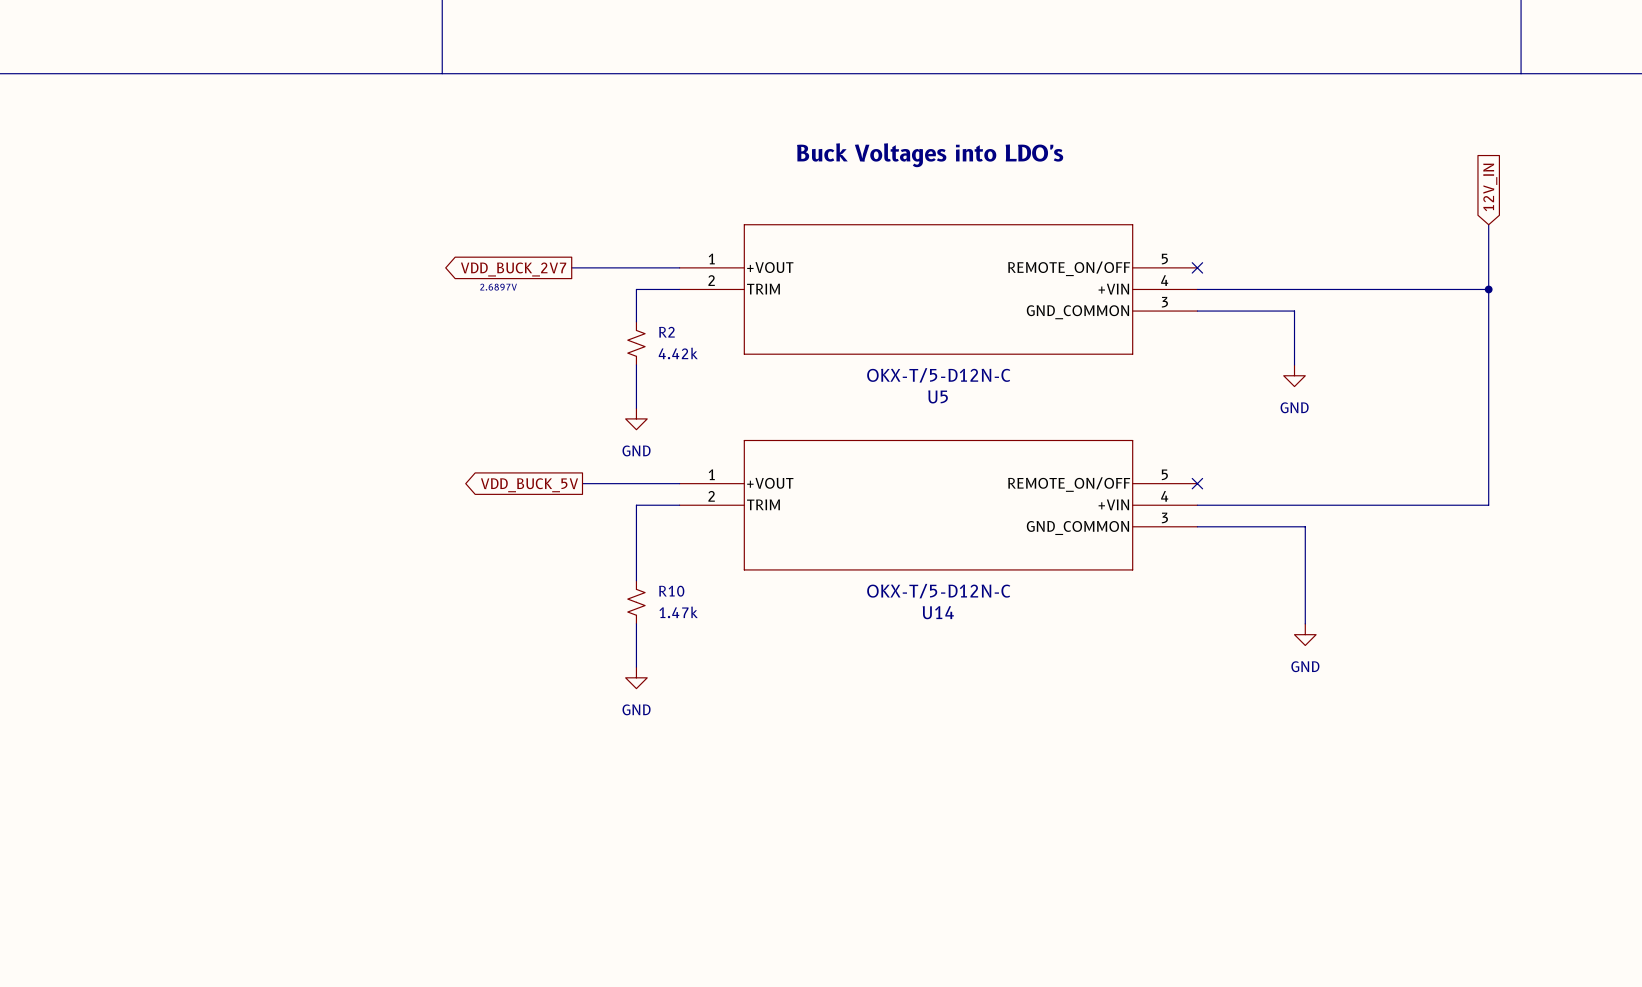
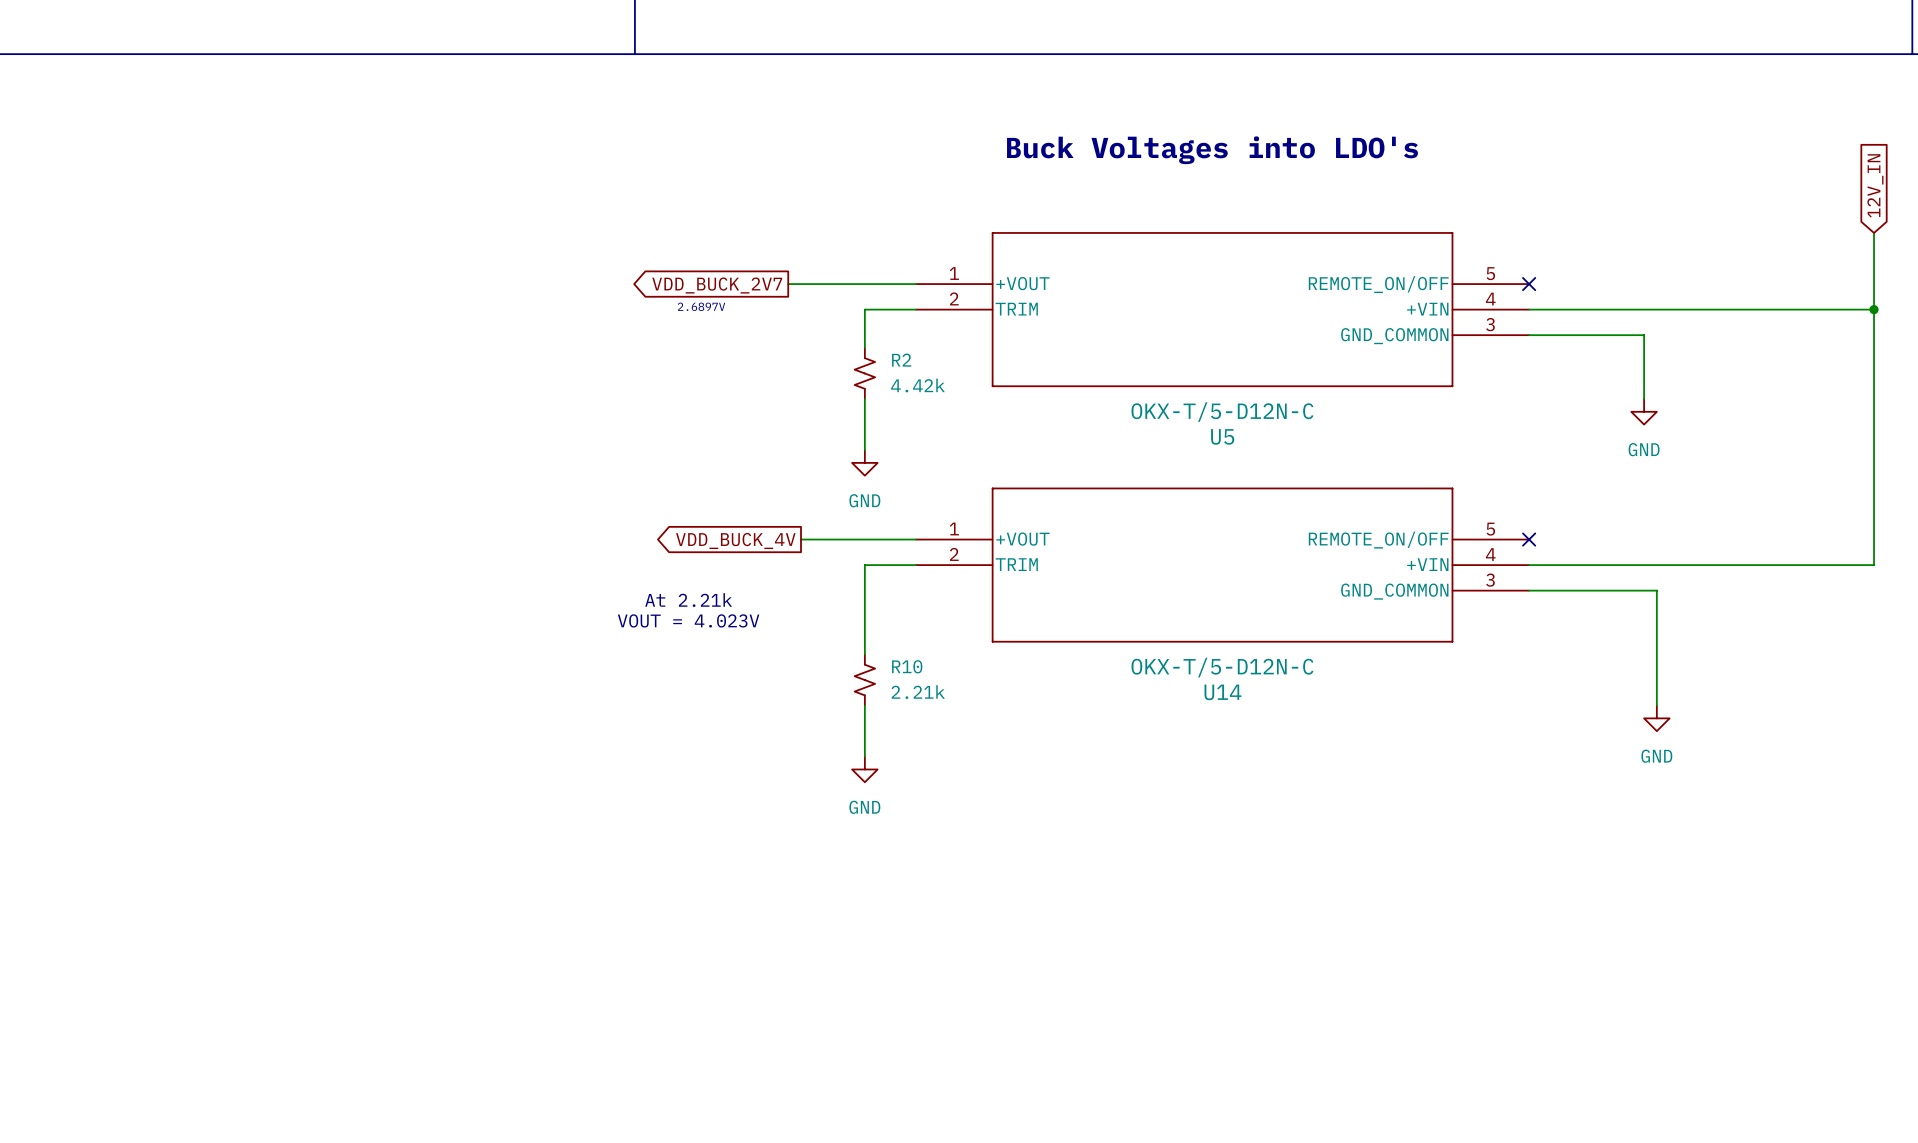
global label: VDD_BUCK_5V (529, 485) -> VDD_BUCK_4V (735, 540)
text: none -> At 2.21k (688, 600)
text: none -> VOUT = 4.023V (688, 620)
R10 value: 1.47k (678, 612) -> 2.21k (918, 692)

